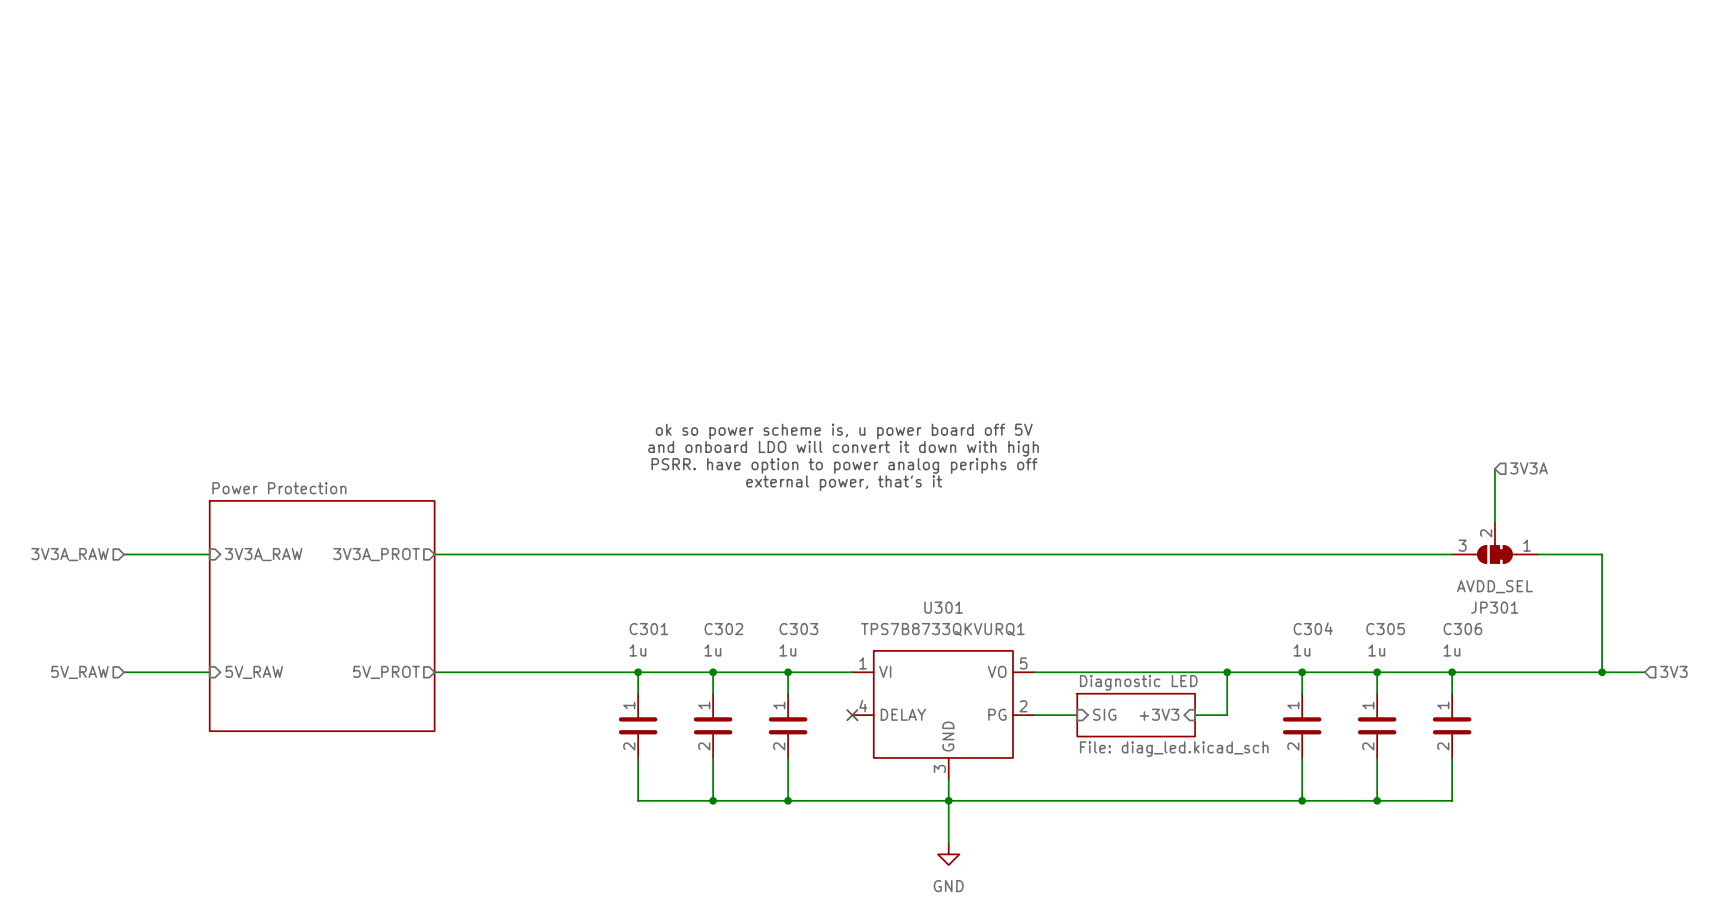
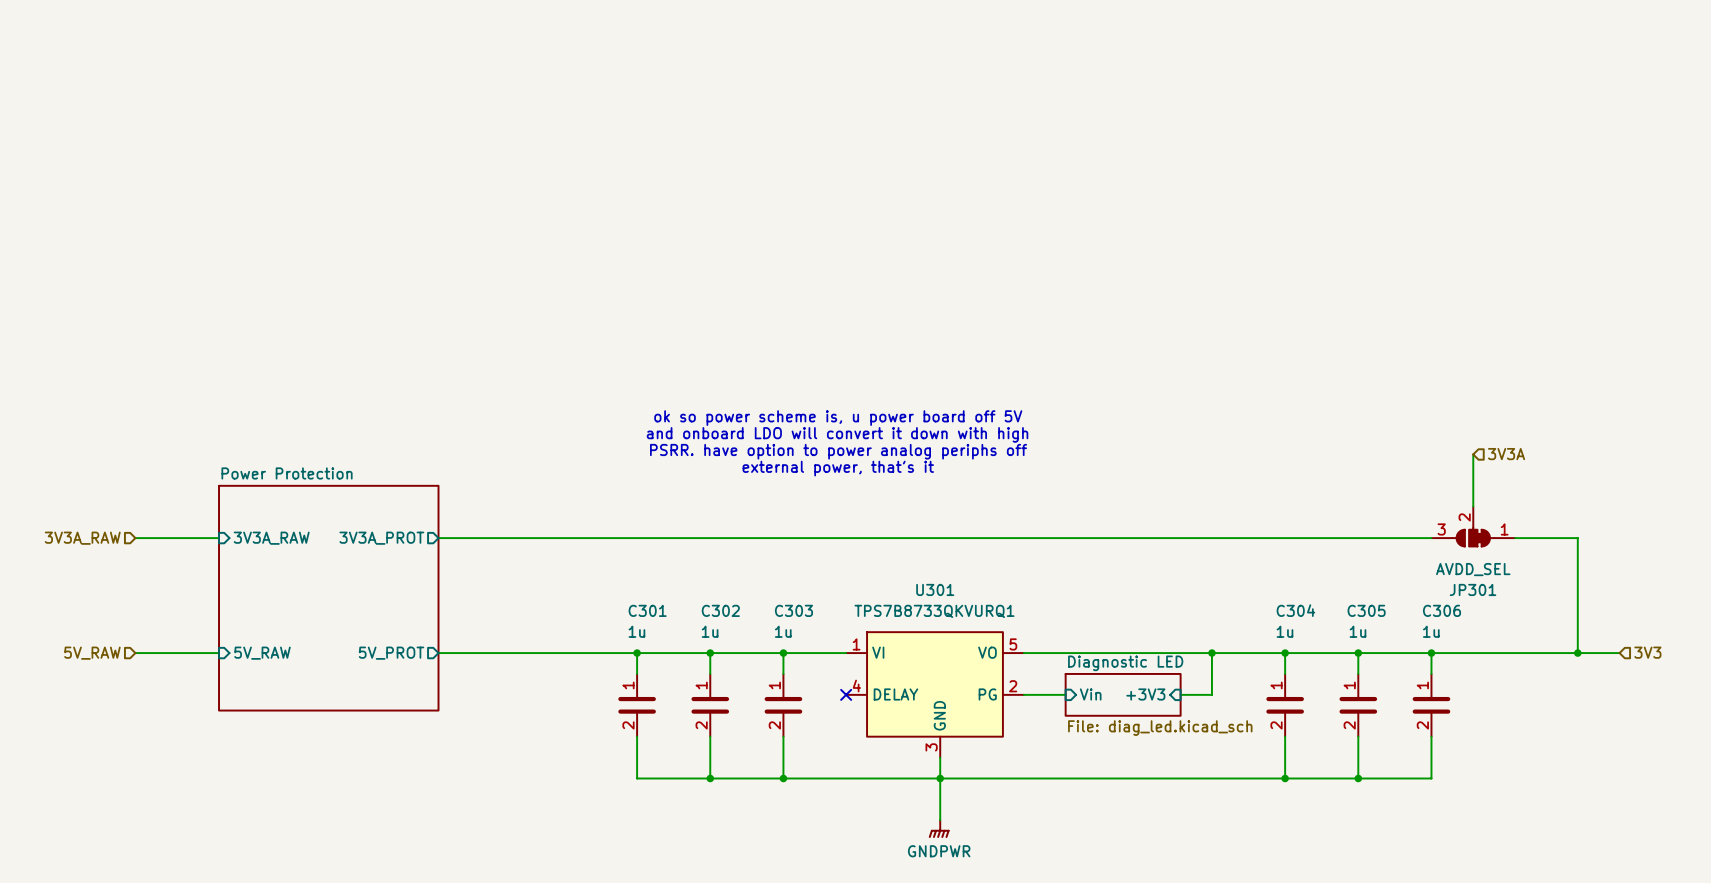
sheet pin: SIG (1104, 714) -> Vin (1090, 694)
power symbol: GND (948, 854) -> GNDPWR (939, 829)

